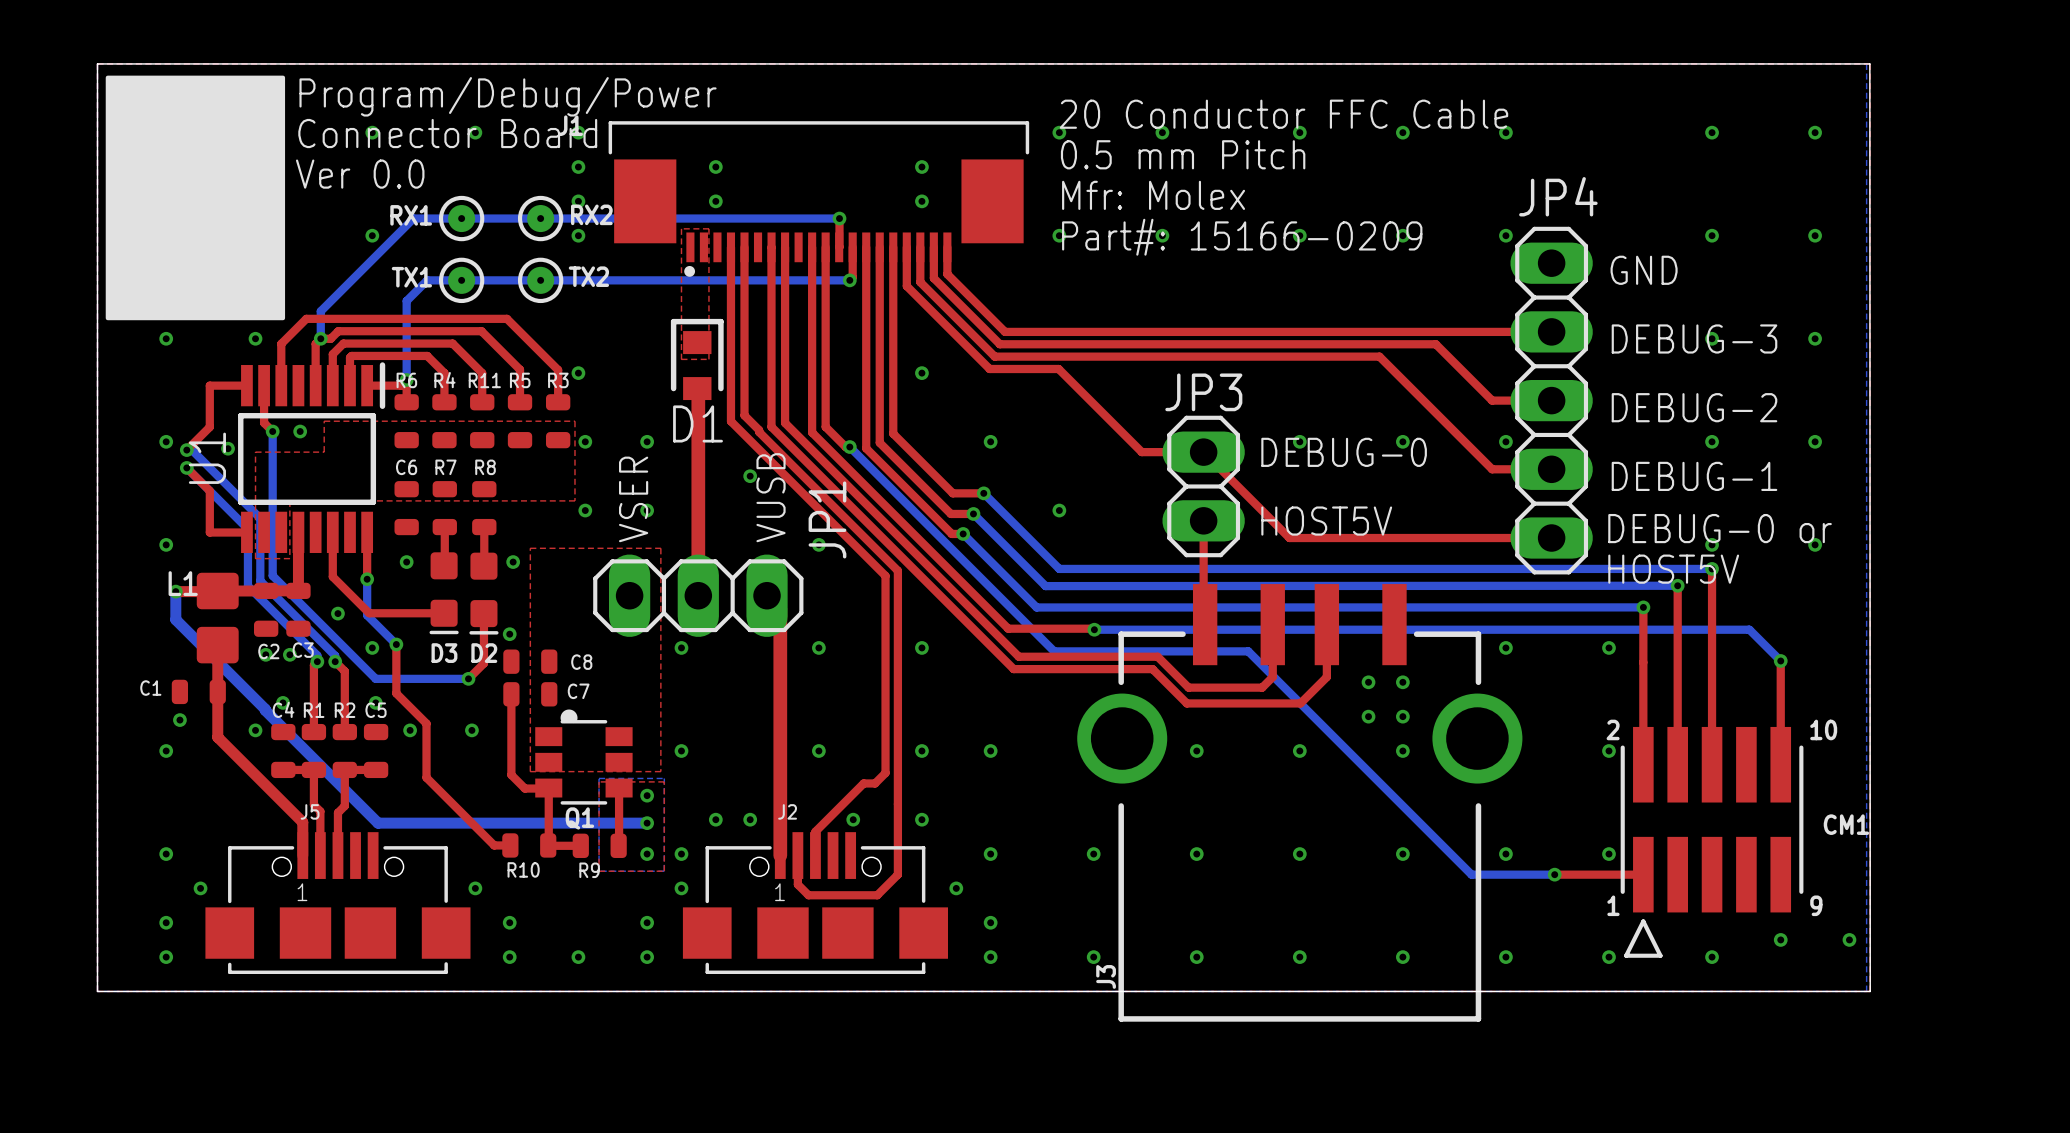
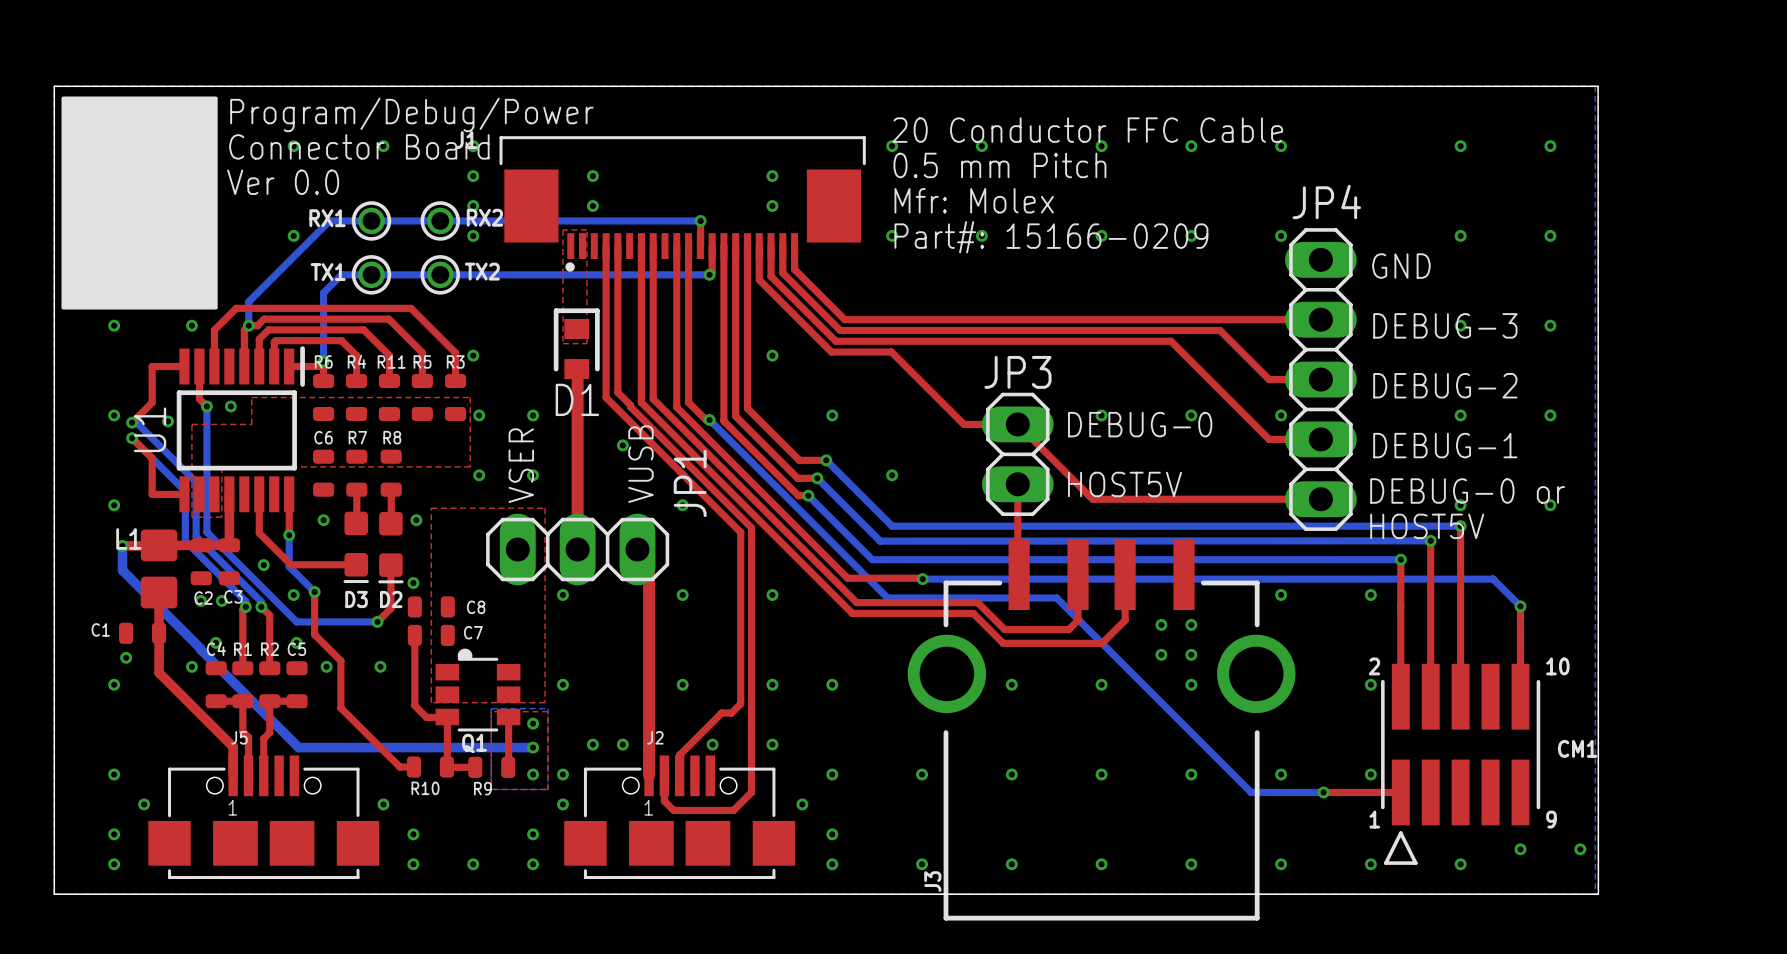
RX1 footprint: [438, 195, 485, 242] -> [351, 201, 392, 241]
RX2 footprint: [517, 195, 564, 242] -> [420, 201, 461, 241]
TX1 footprint: [438, 257, 485, 304] -> [351, 255, 392, 295]
TX2 footprint: [517, 257, 564, 304] -> [420, 255, 461, 295]

